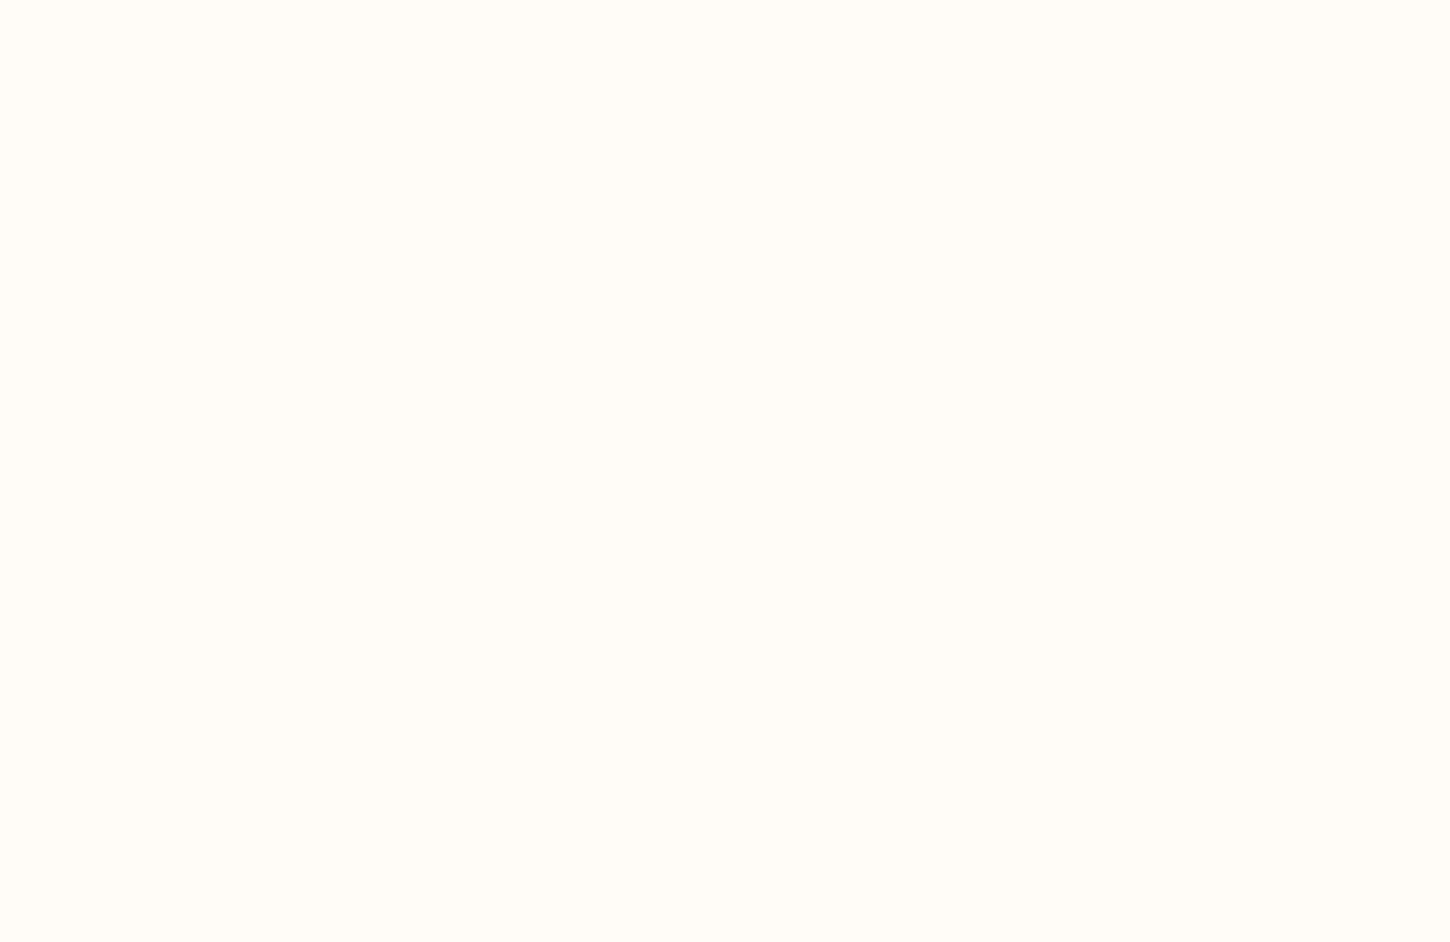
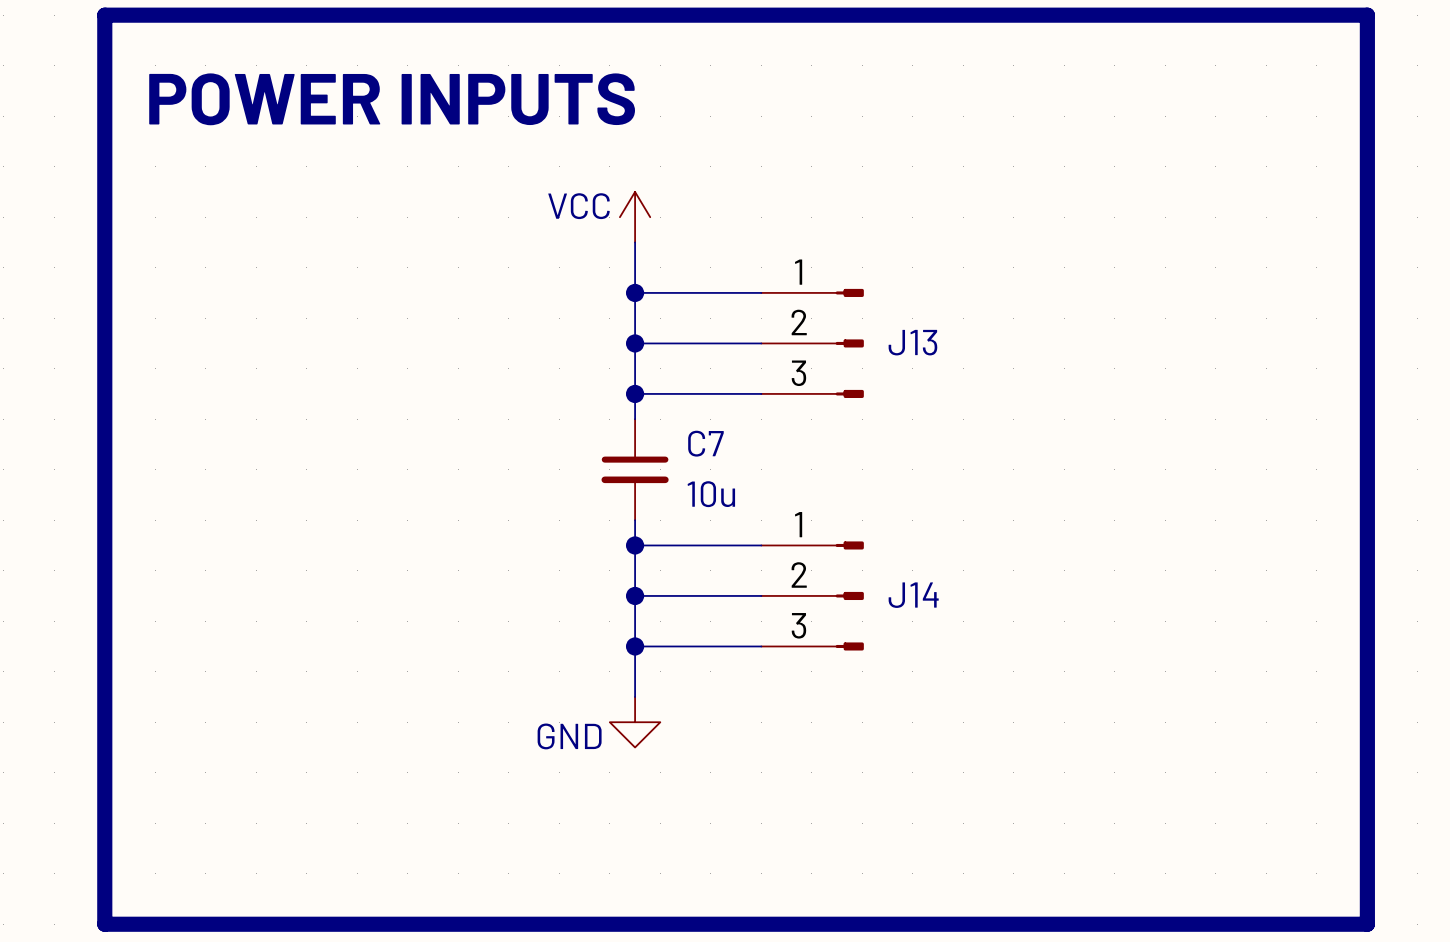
line: none -> (104, 15) (1367, 15) (1367, 924) (104, 924) (104, 15)
text: none -> POWER INPUTS (392, 99)
power symbol: none -> VCC (635, 217)
wire: none -> (635, 242) (635, 419)
wire: none -> (635, 292) (761, 292)
junction: none -> (635, 292)
wire: none -> (635, 343) (761, 343)
junction: none -> (635, 343)
J13: none -> (812, 343)
wire: none -> (635, 393) (761, 393)
junction: none -> (635, 393)
C7: none -> 10u (635, 469)
wire: none -> (635, 520) (635, 696)
wire: none -> (635, 545) (761, 545)
junction: none -> (635, 545)
wire: none -> (635, 595) (761, 595)
junction: none -> (635, 595)
J14: none -> (812, 595)
wire: none -> (635, 646) (761, 646)
junction: none -> (635, 646)
power symbol: none -> GND (635, 722)

